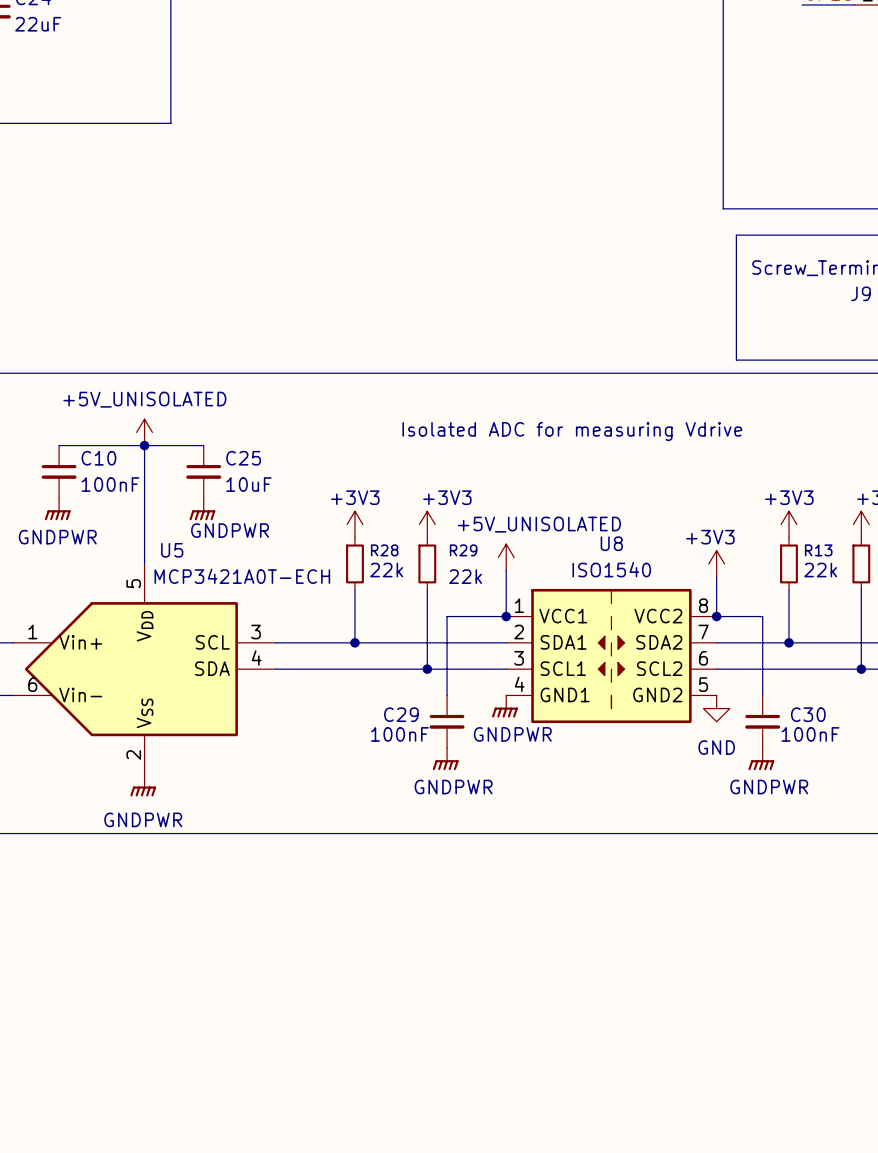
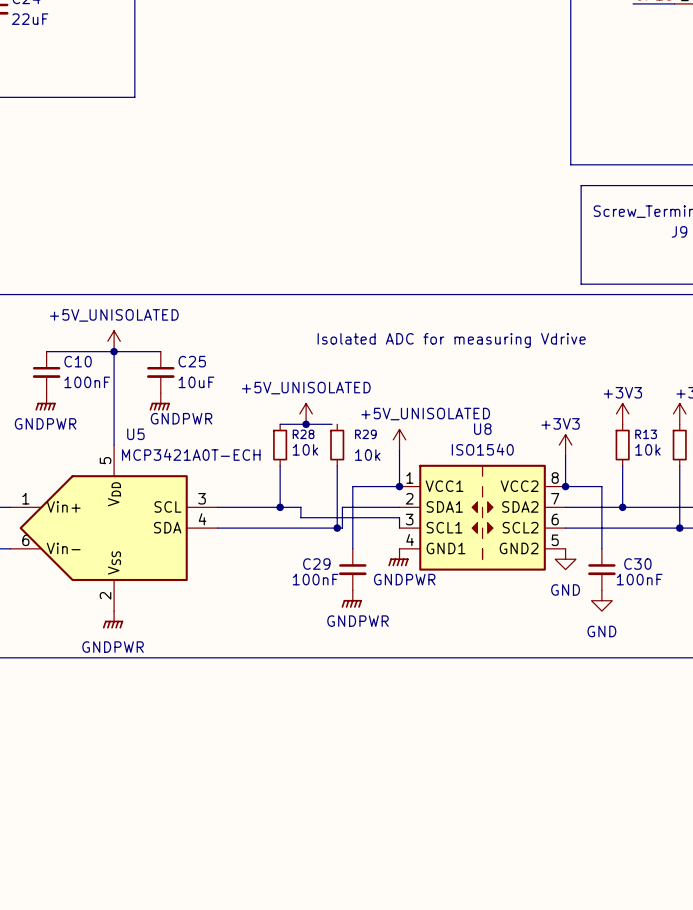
power symbol: +3V3 (354, 524) -> none
power symbol: none -> +5V_UNISOLATED (306, 413)
power symbol: +3V3 (427, 524) -> none
wire: none -> (280, 424) (332, 424)
junction: none -> (306, 424)
R28 value: 22k (386, 570) -> 10k (305, 449)
R13 value: 22k (820, 570) -> 10k (647, 449)
R29 value: 22k (465, 576) -> 10k (367, 455)
wire: (381, 642) (433, 642) -> (342, 528) (342, 507)
wire: (433, 669) (506, 669) -> (300, 507) (300, 517) (399, 517) (399, 528)
power symbol: GNDPWR (761, 759) -> GND (601, 600)

